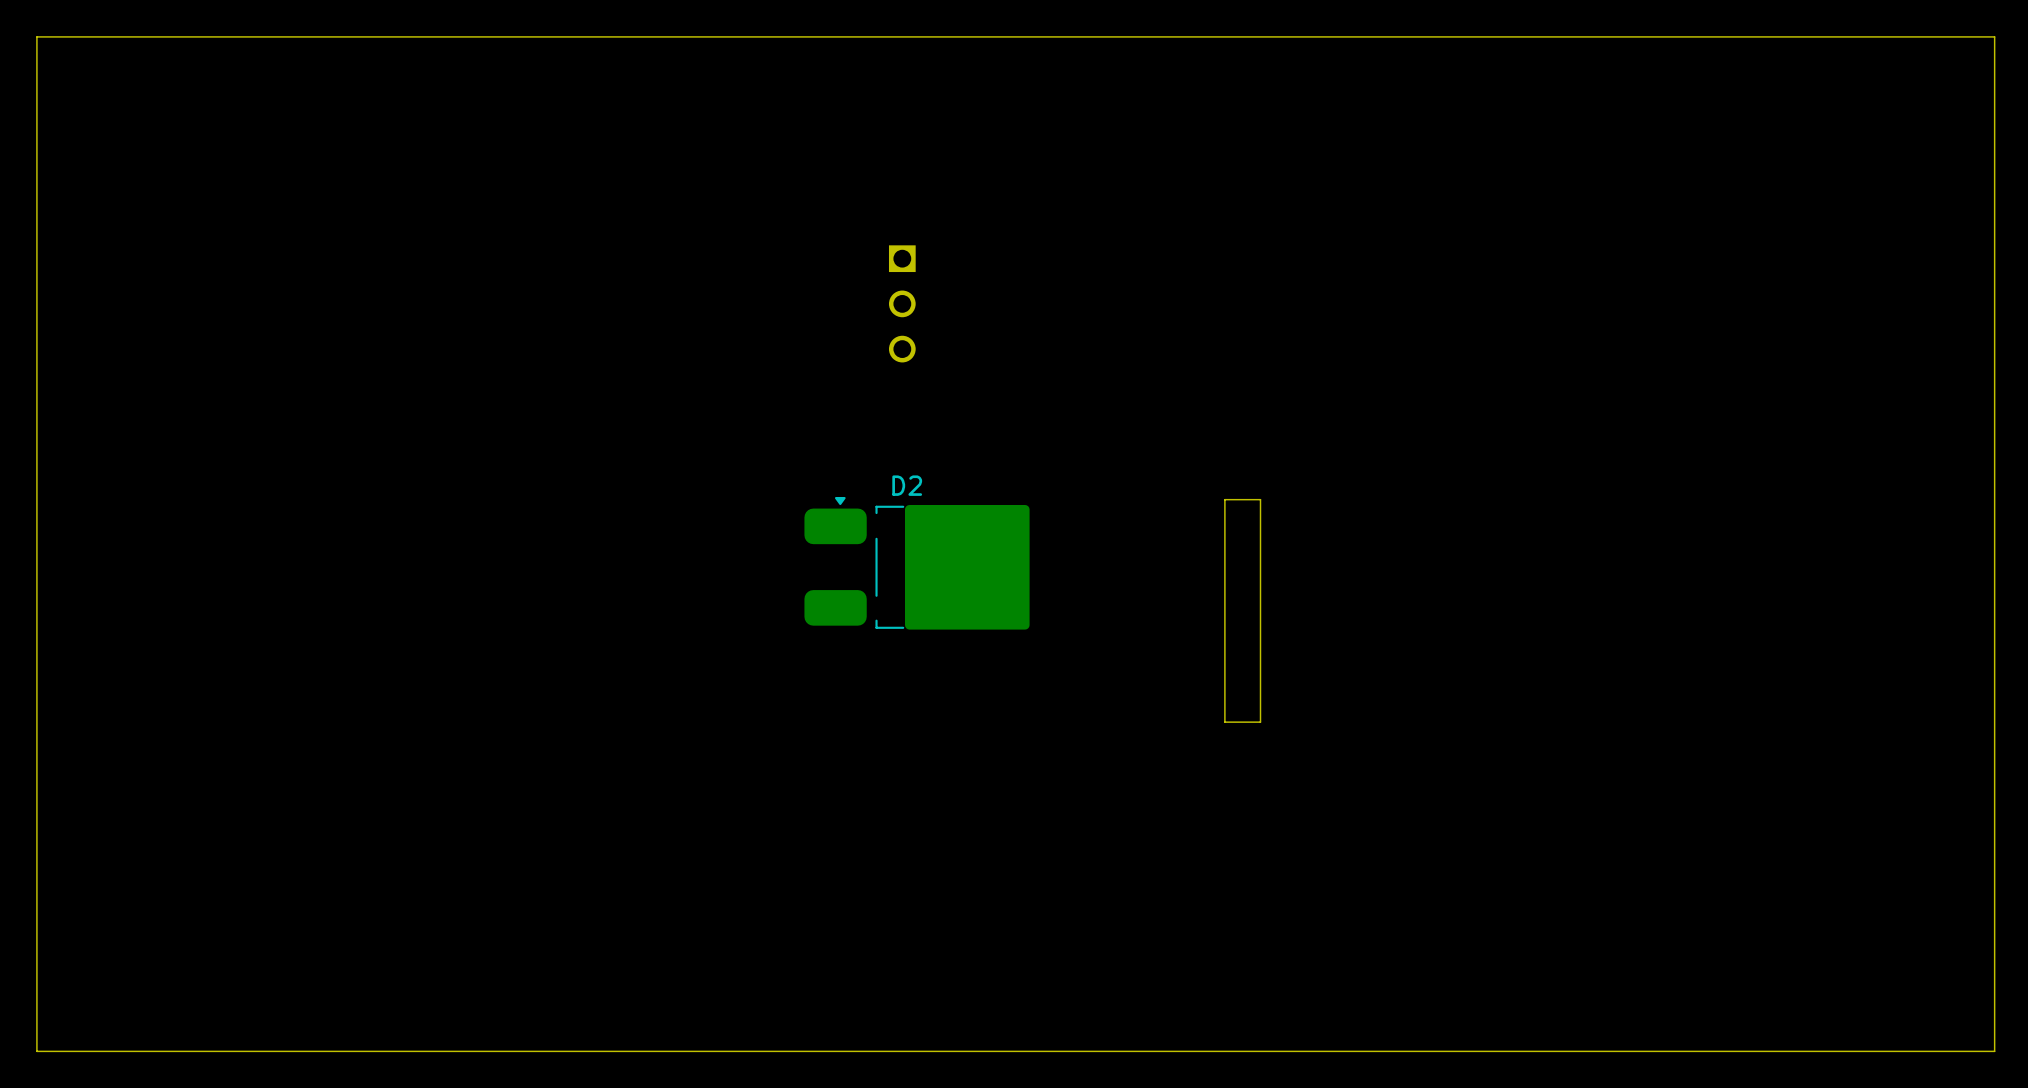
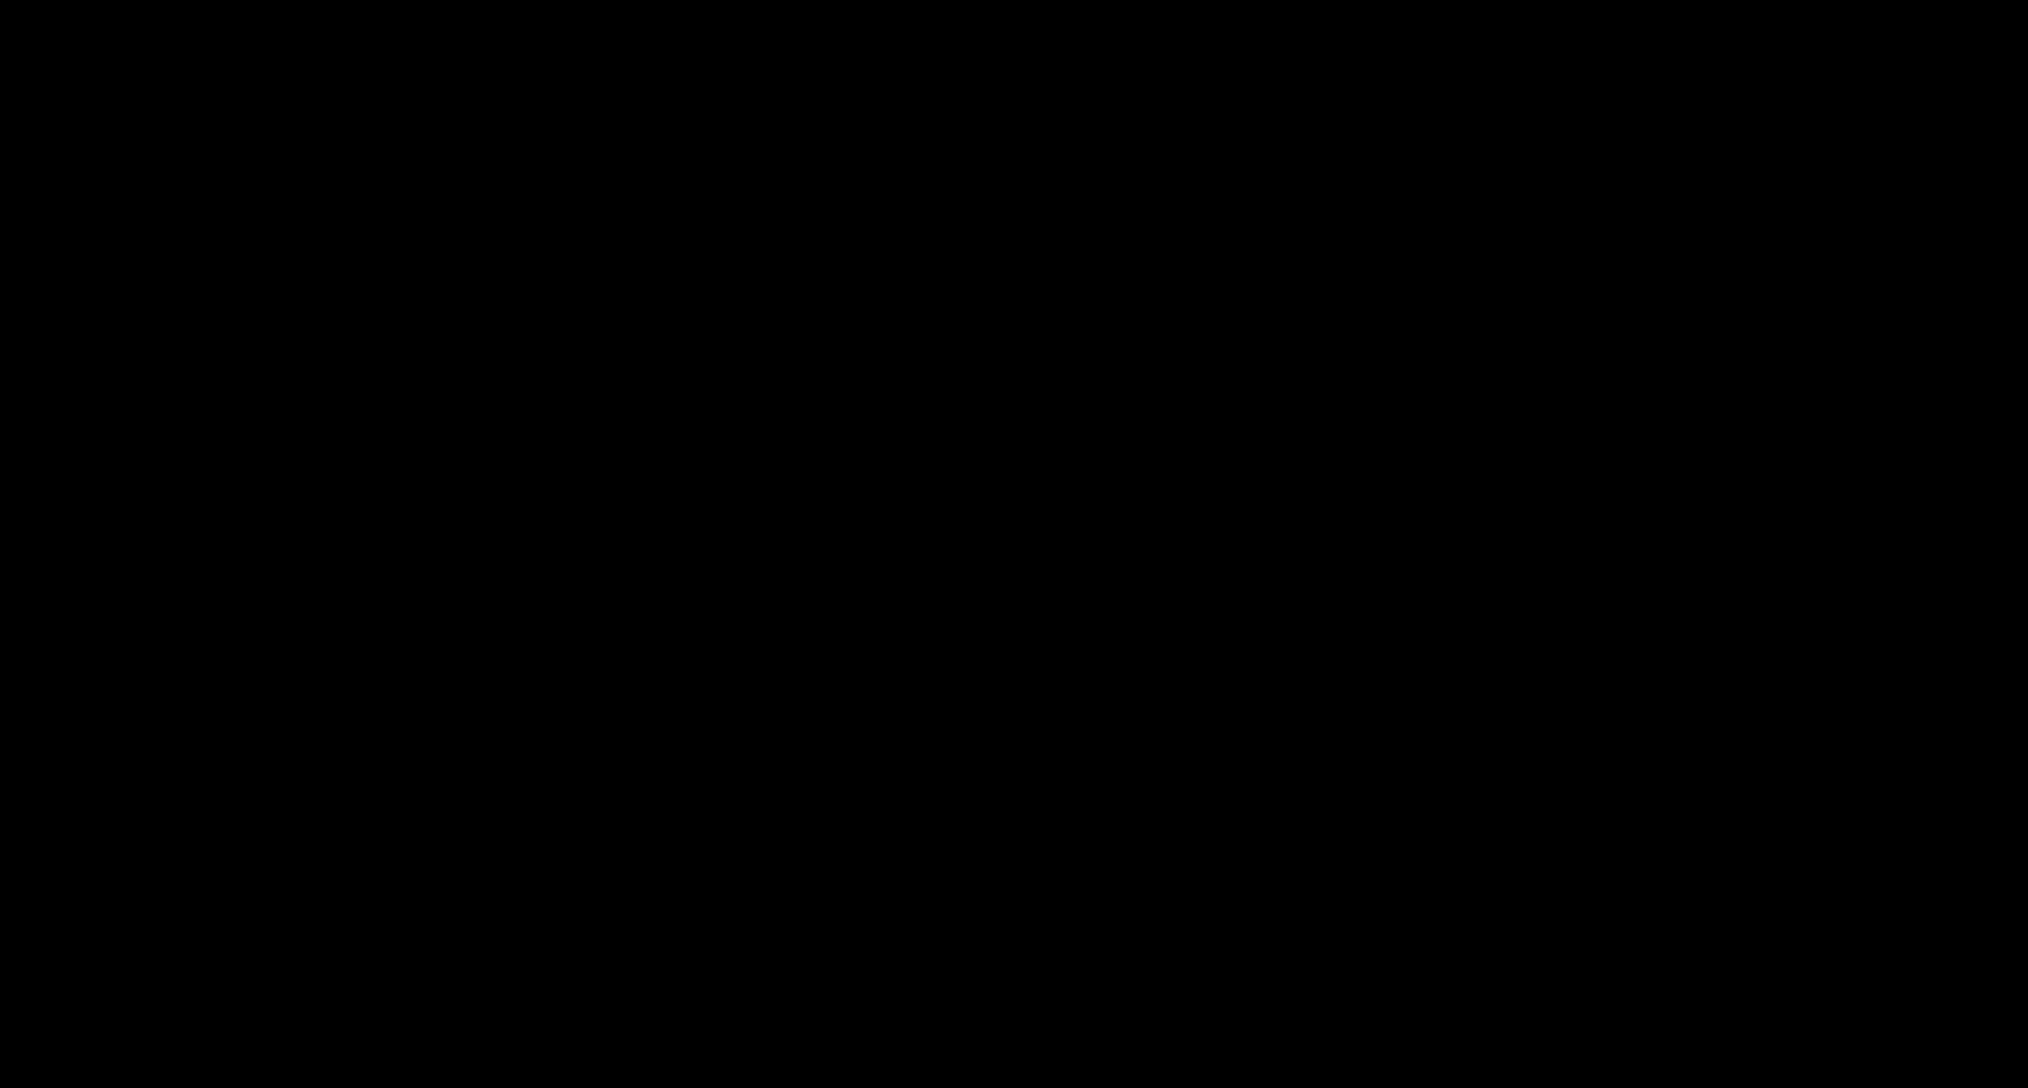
board edge: (1994, 36) (36, 36) (36, 1051) (1994, 1051) (1994, 36) -> none
part: (902, 303) -> none
board edge: (1260, 499) (1224, 499) (1224, 722) (1260, 722) (1260, 499) -> none
D2: (917, 563) -> none

